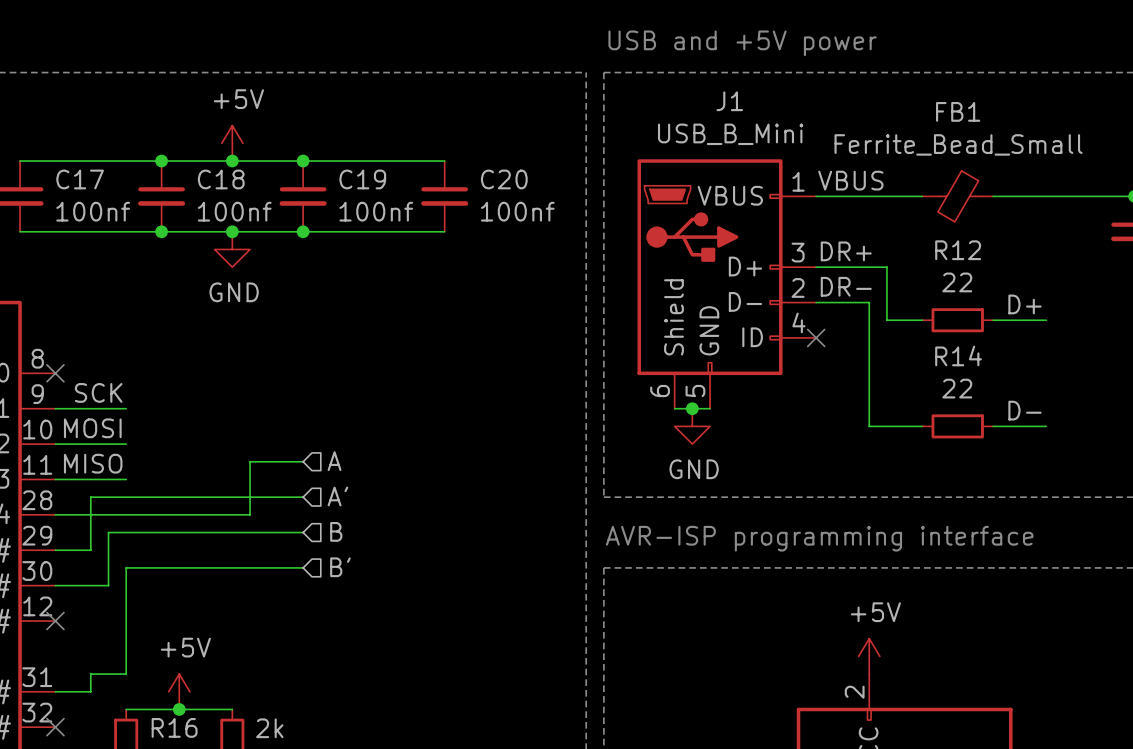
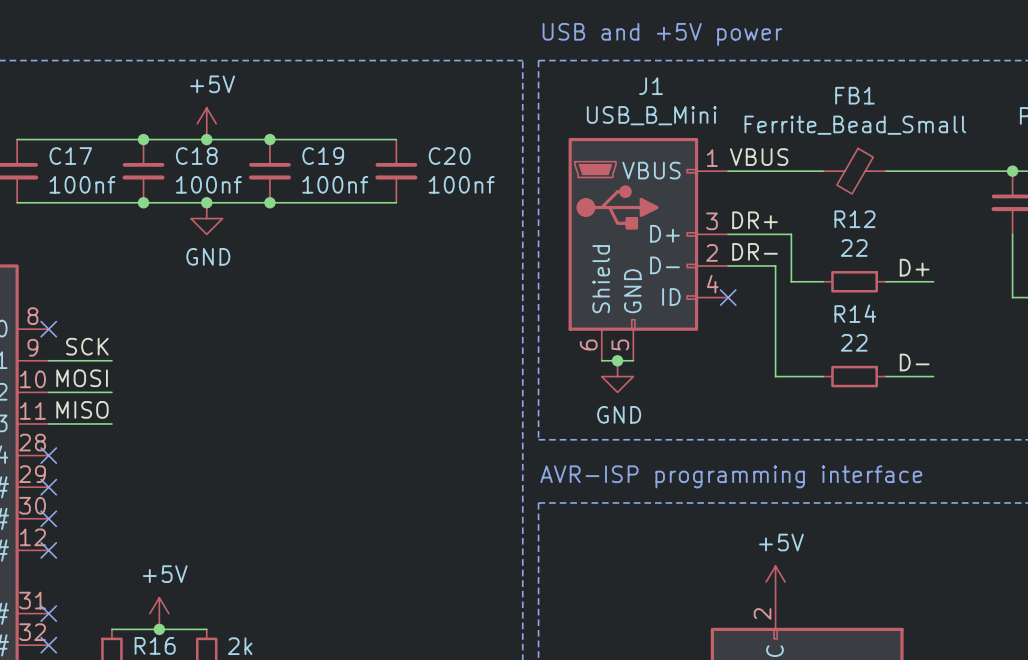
wire: (303, 461) (250, 461) (250, 514) (55, 514) -> none
hierarchical label: A (334, 461) -> none
hierarchical label: A' (337, 496) -> none
wire: (303, 497) (90, 497) (90, 550) (55, 550) -> none
no-connect mark: none -> (48, 455)
hierarchical label: B (336, 531) -> none
wire: (303, 532) (108, 532) (108, 585) (55, 585) -> none
no-connect mark: none -> (48, 487)
wire: (303, 567) (126, 567) (126, 674) (90, 674) (90, 691) (55, 691) -> none
hierarchical label: B' (340, 567) -> none
no-connect mark: none -> (48, 518)
no-connect mark: none -> (48, 613)

